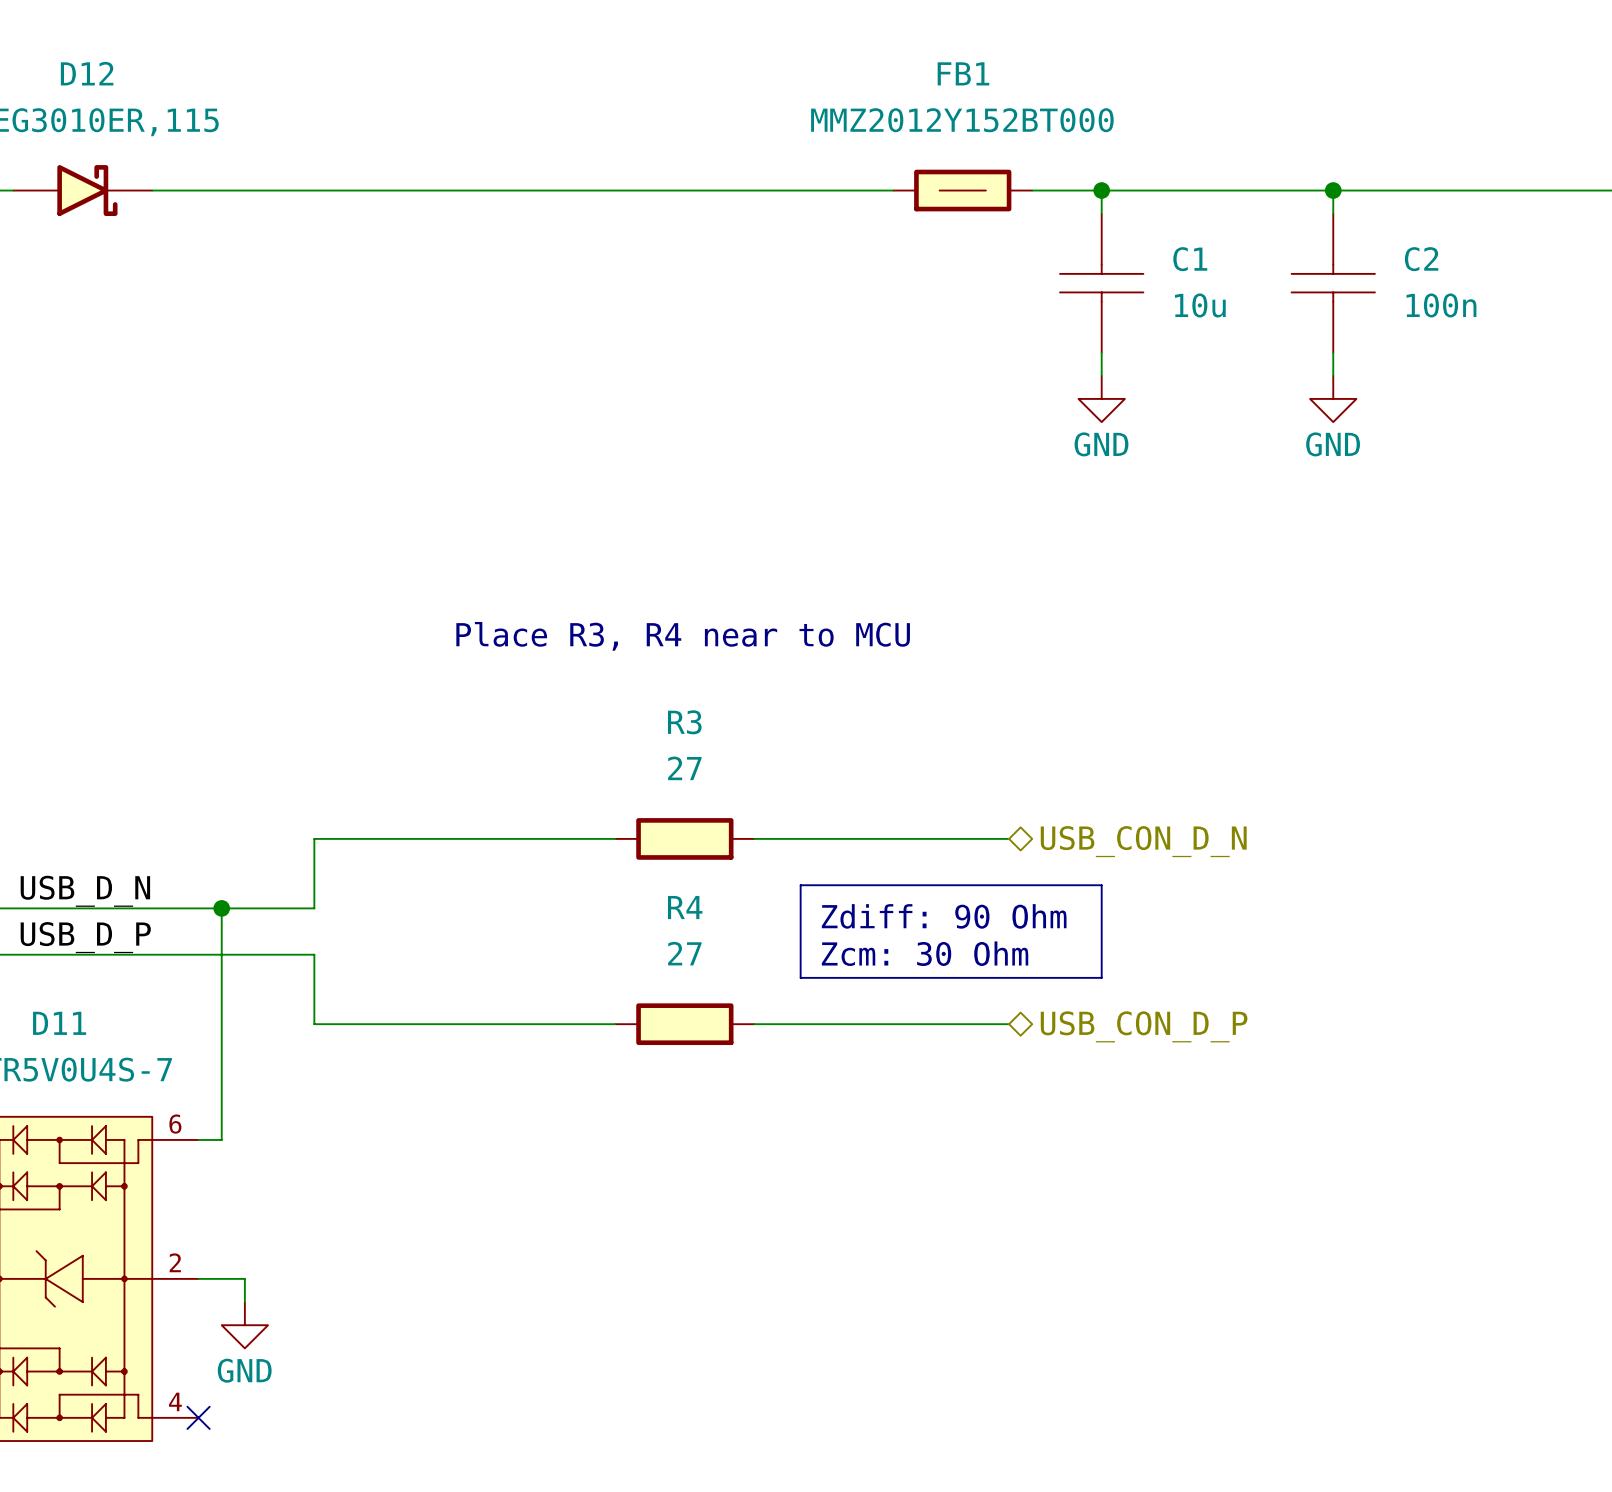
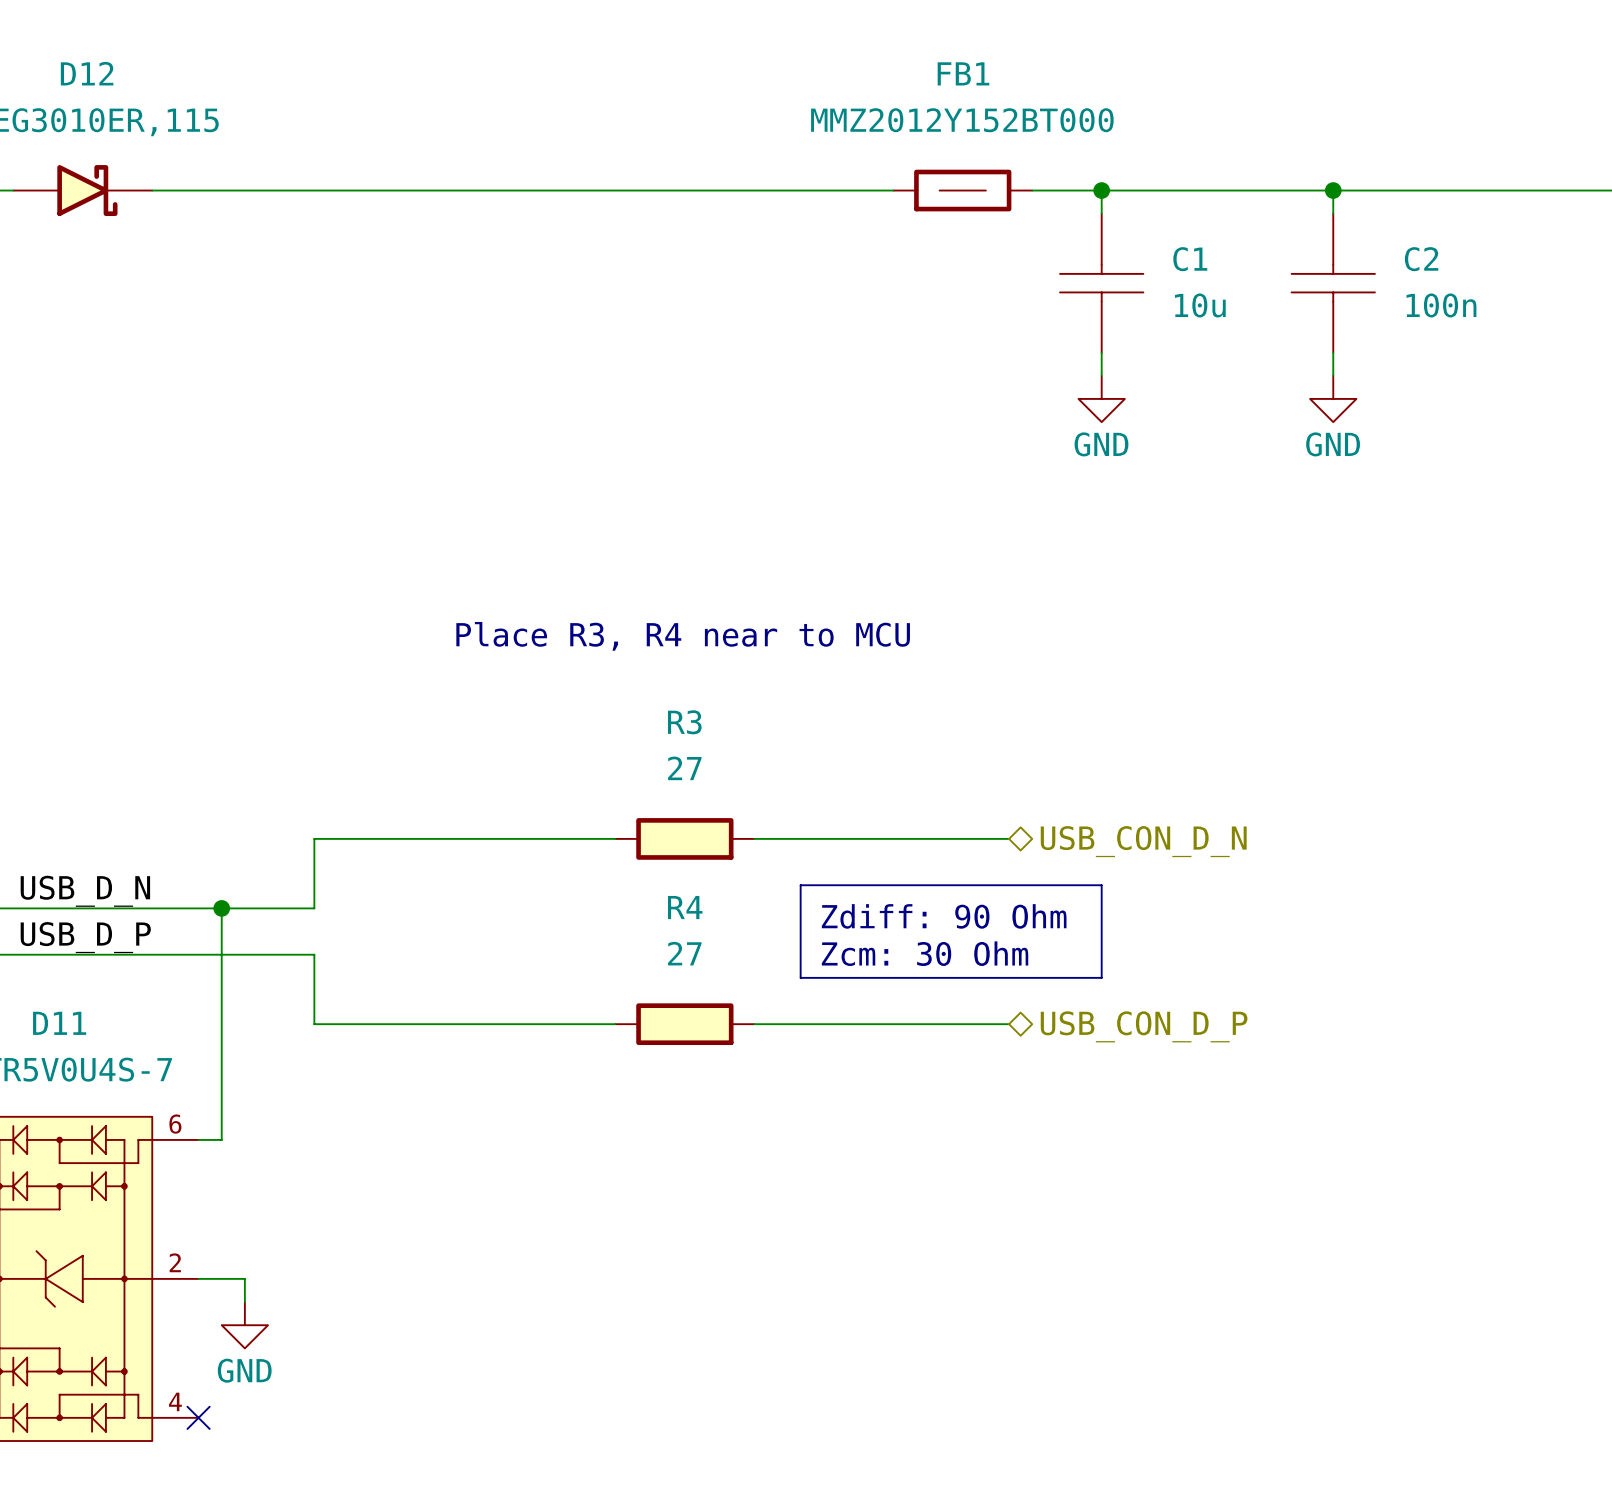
FB1 symbol: [893, 169, 1033, 212] -> [893, 169, 1033, 212]

